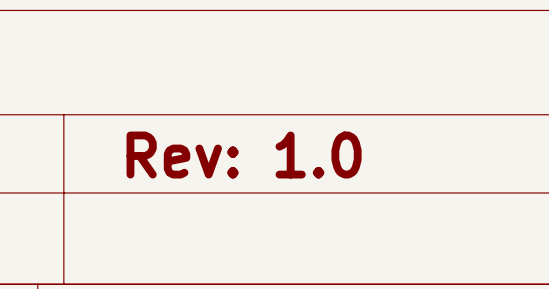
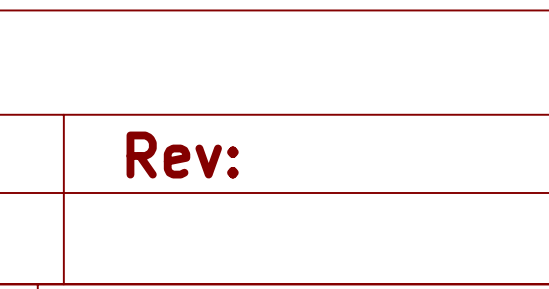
title block: Rev: 1.0 (244, 155) -> Rev: (182, 155)

